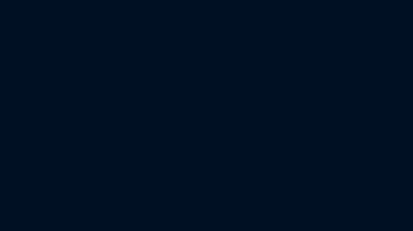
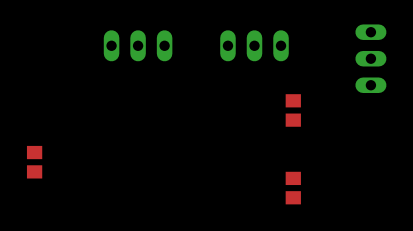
part: none -> (138, 45)
part: none -> (254, 45)
part: none -> (370, 58)
part: none -> (293, 110)
part: none -> (34, 162)
part: none -> (293, 188)

